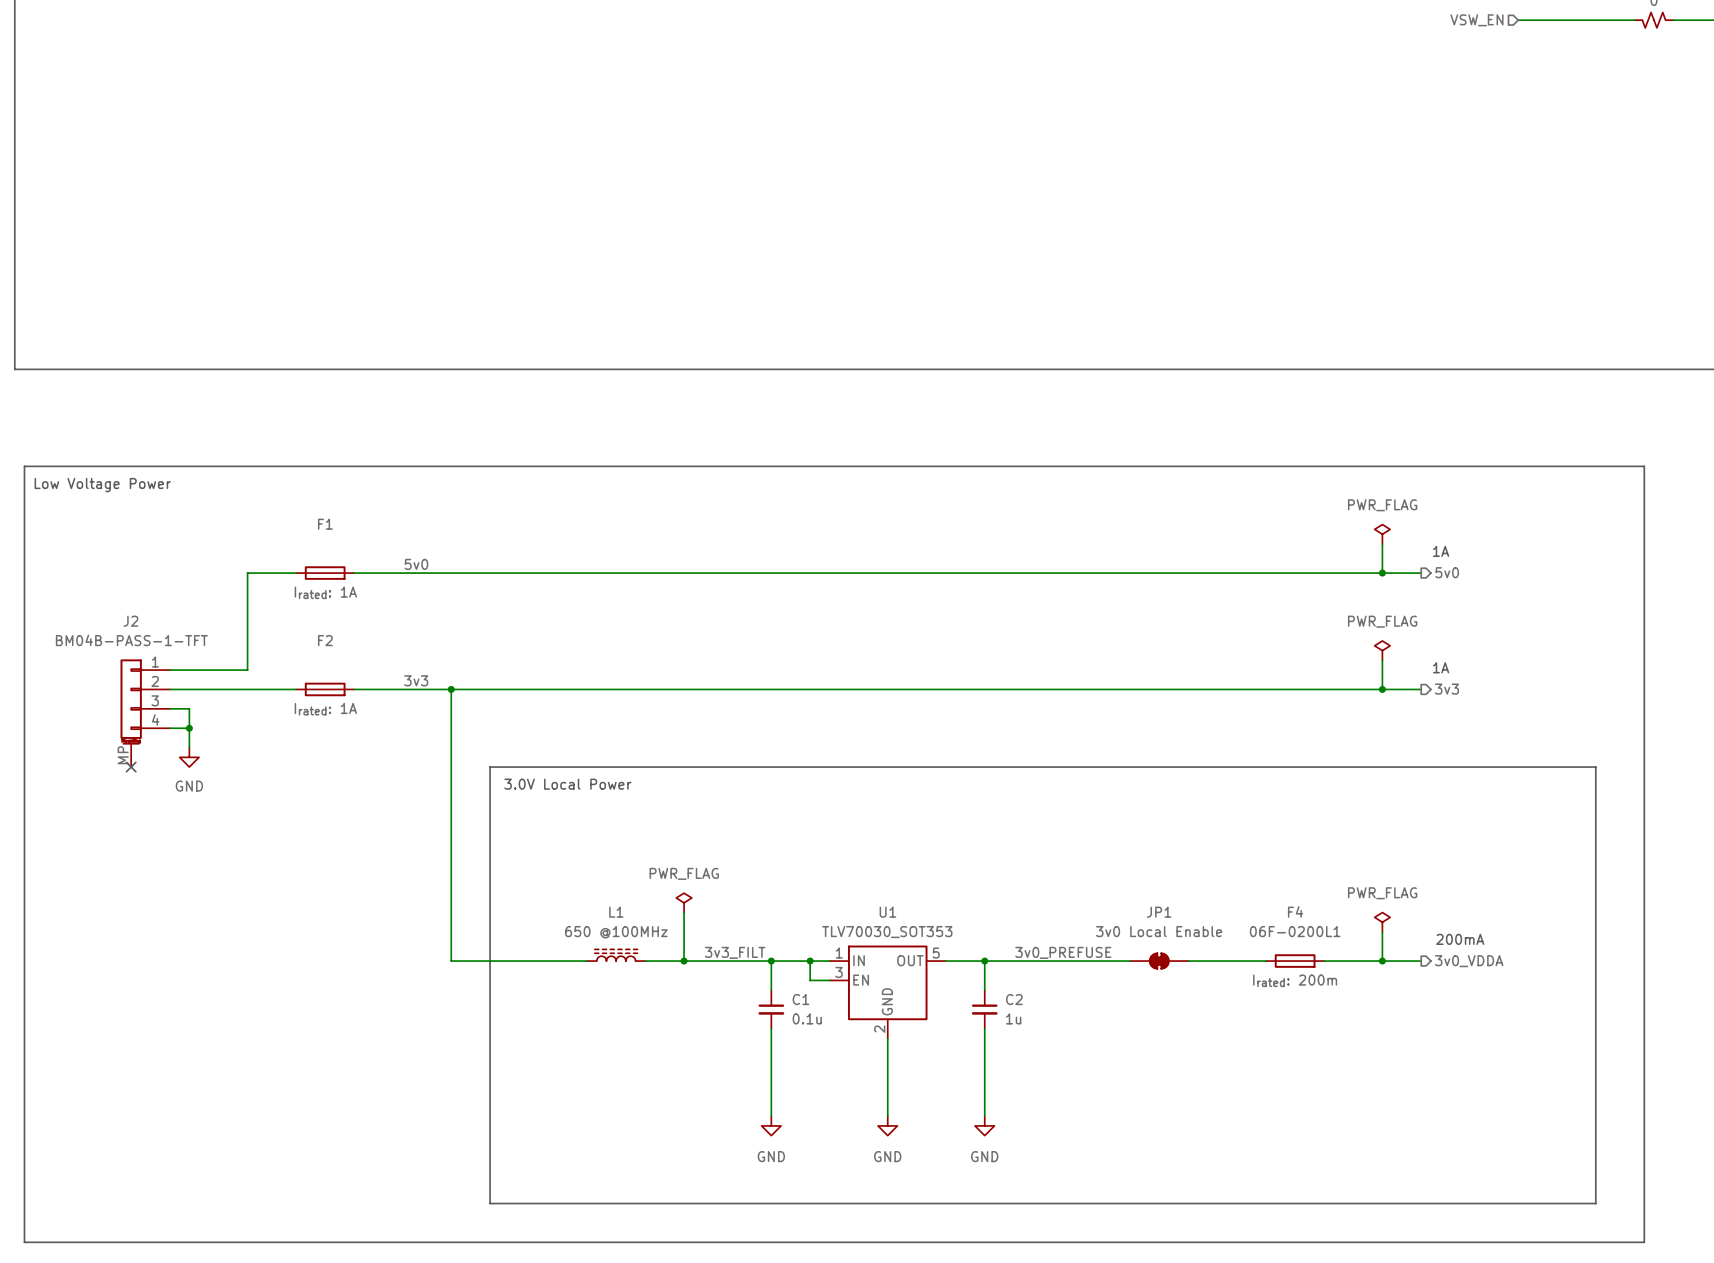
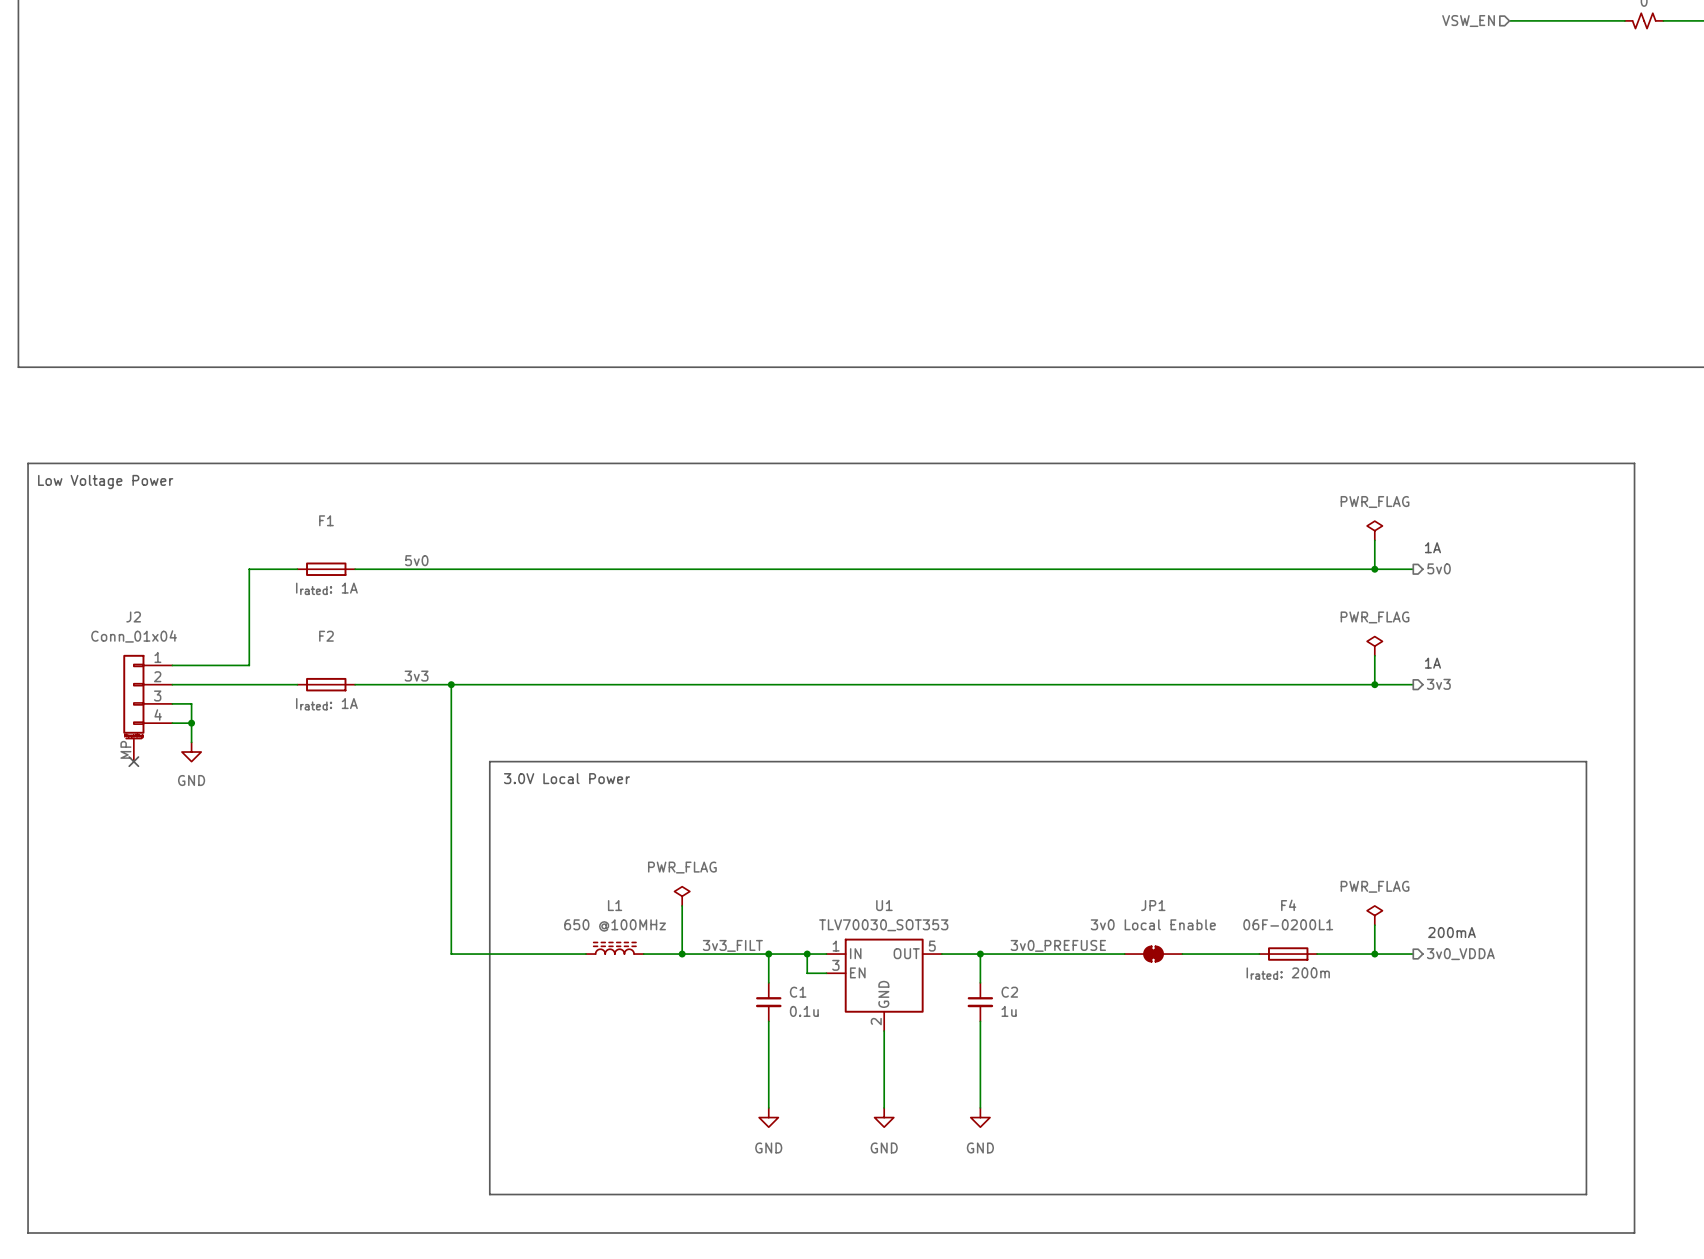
J2 value: BM04B-PASS-1-TFT (131, 640) -> Conn_01x04 (134, 636)

